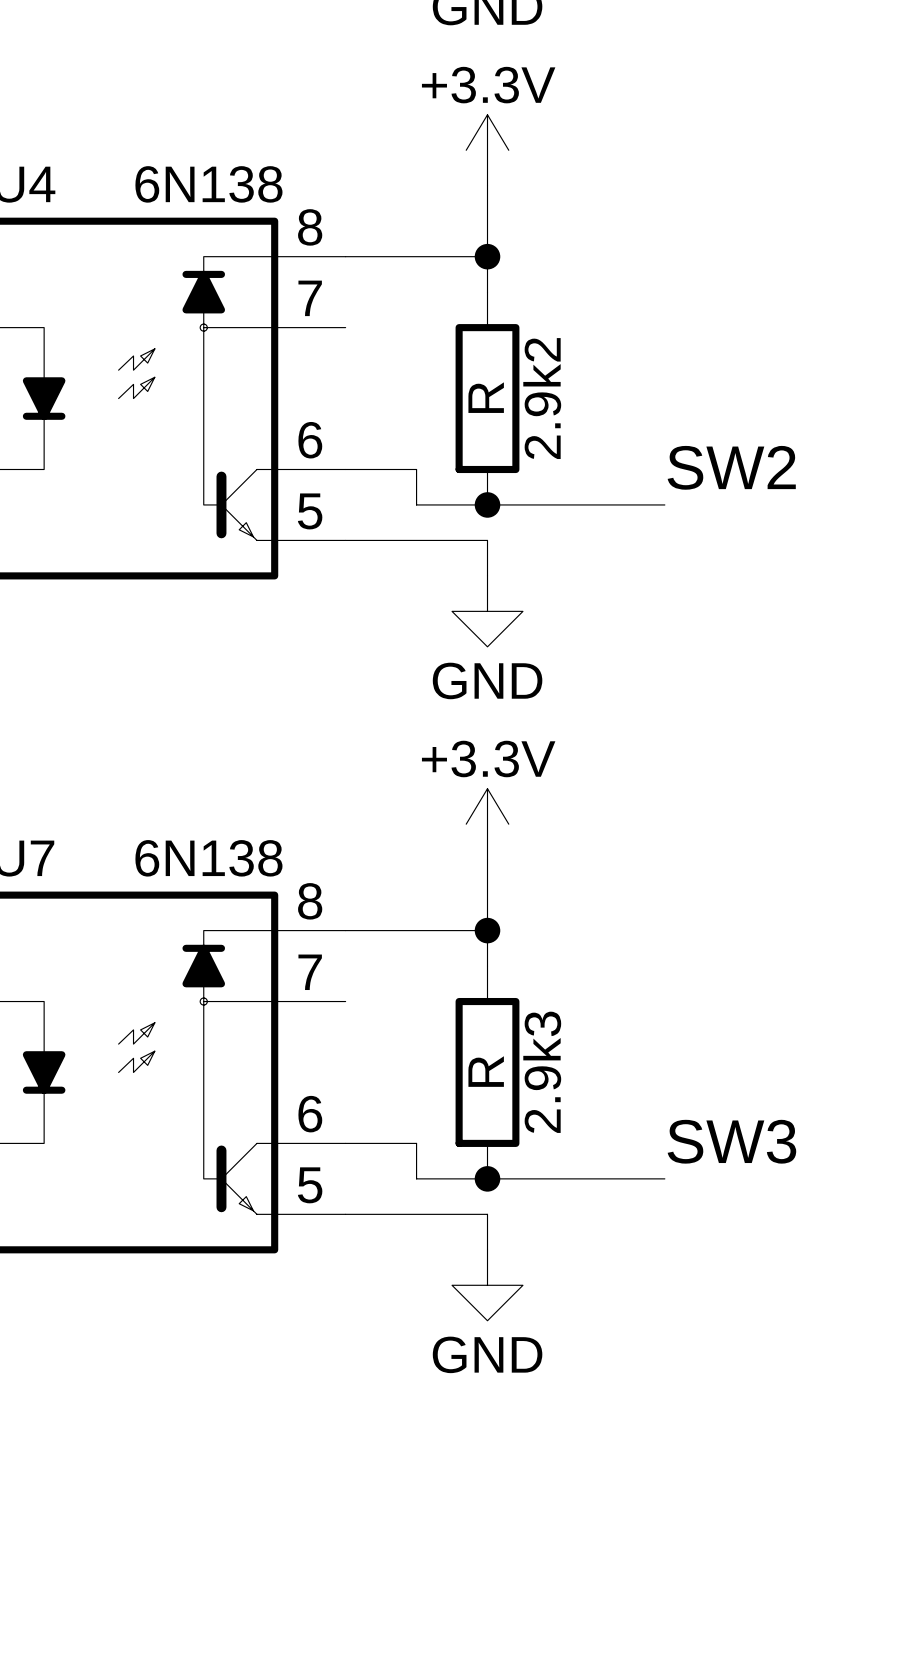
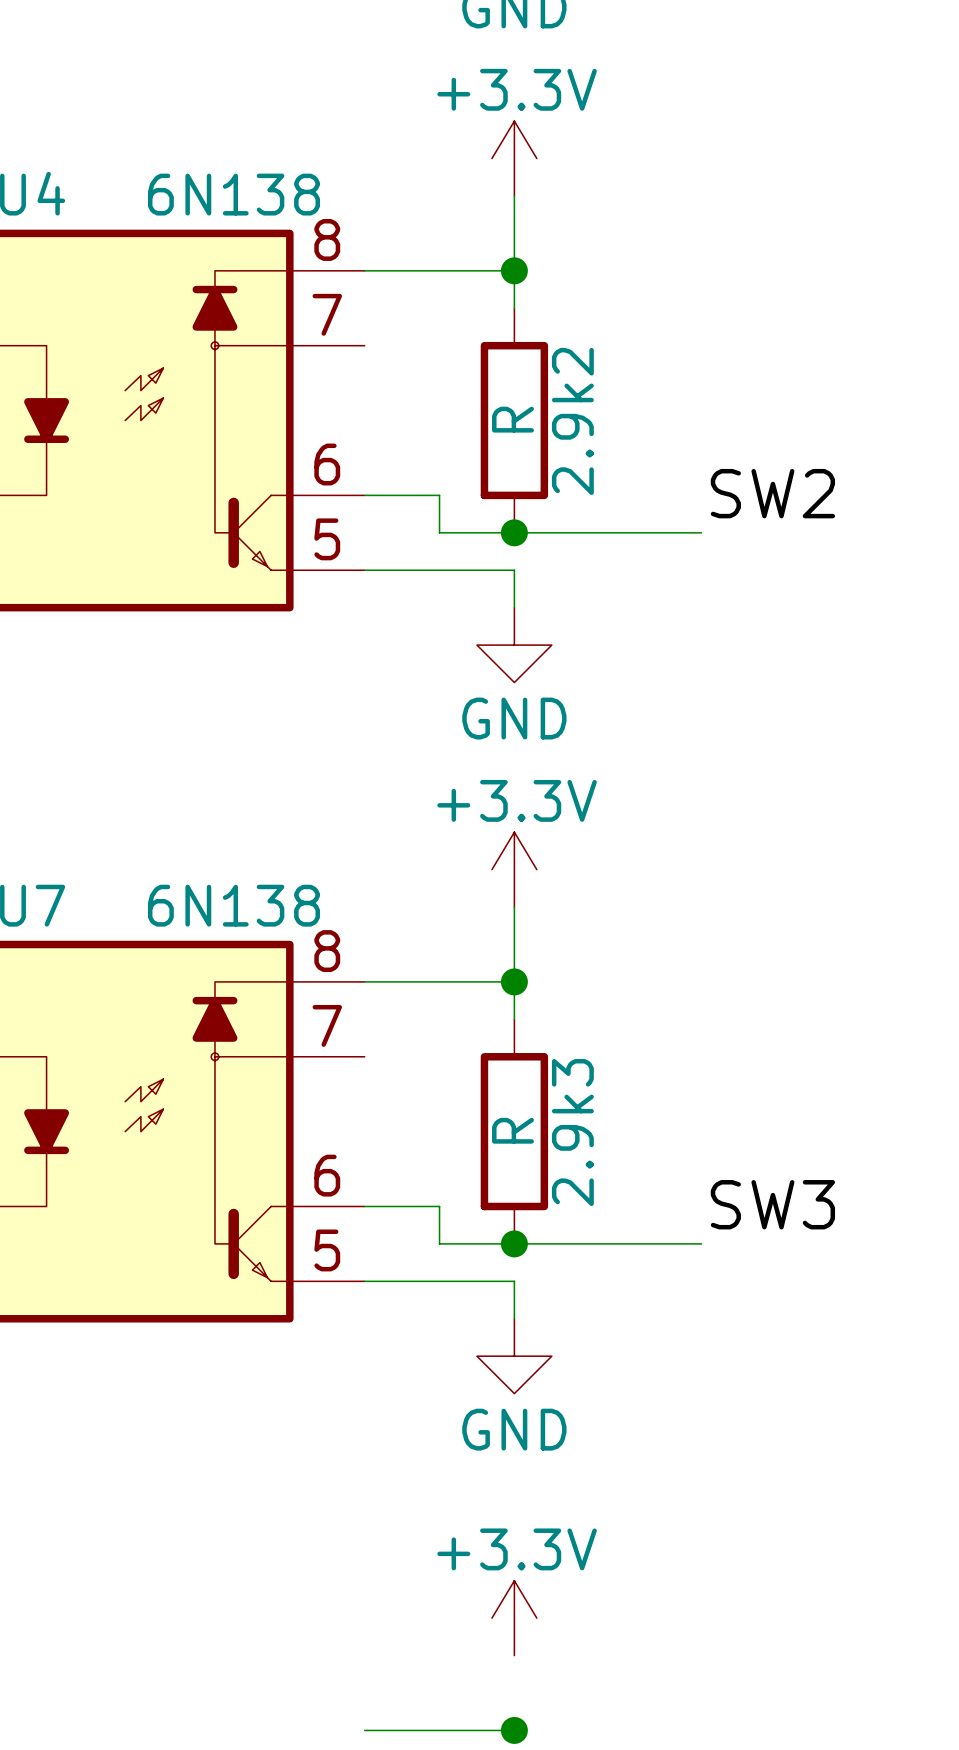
power symbol: none -> +3.3V (514, 1618)
wire: none -> (364, 1730) (514, 1730)
junction: none -> (514, 1730)

